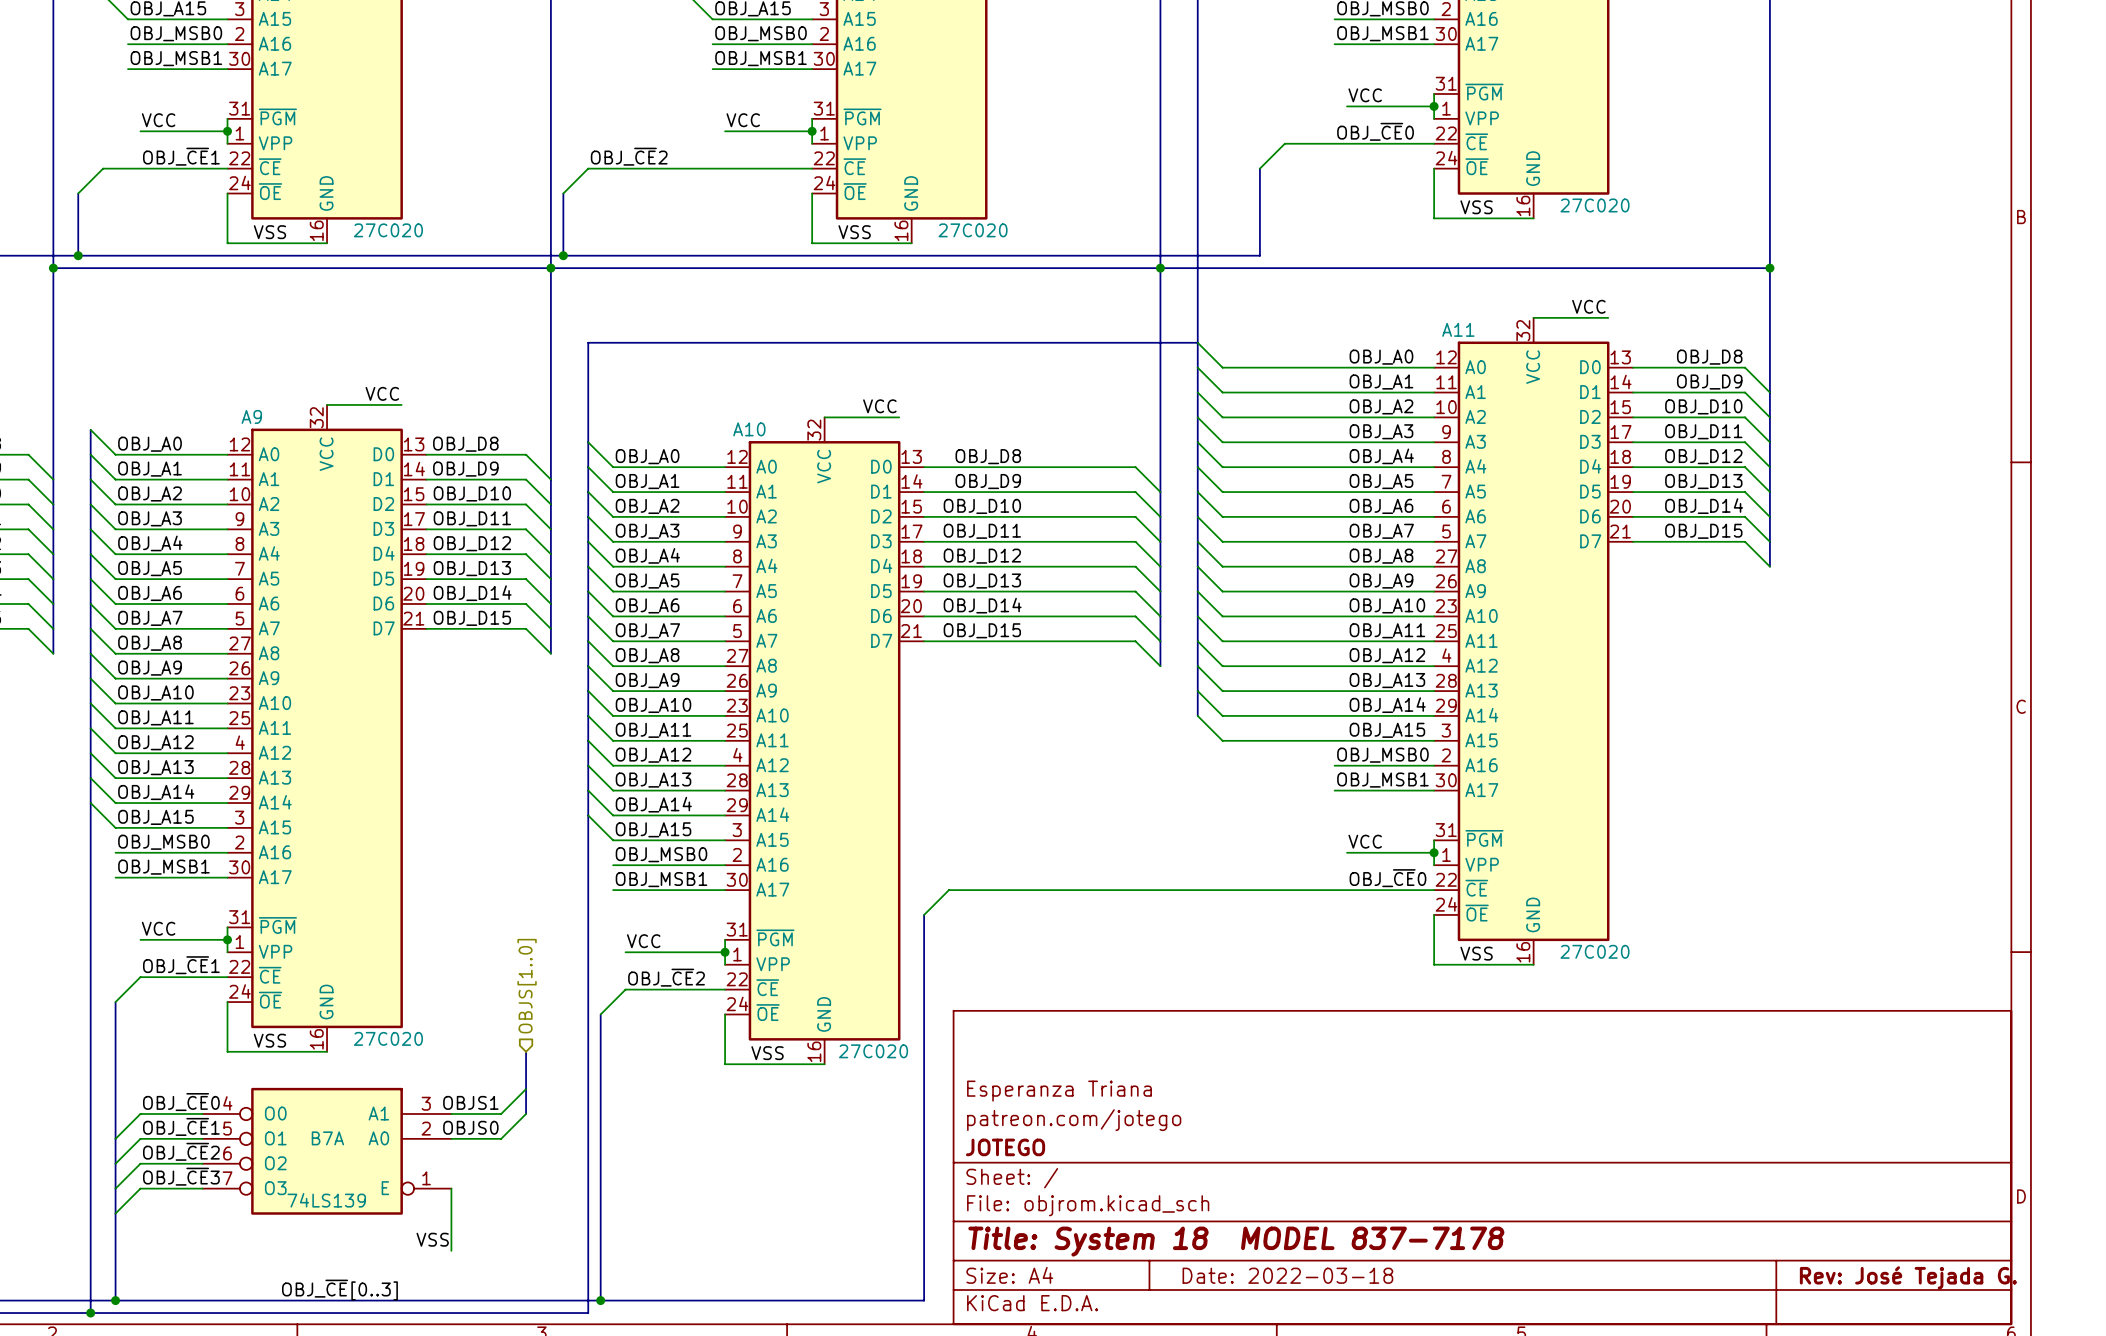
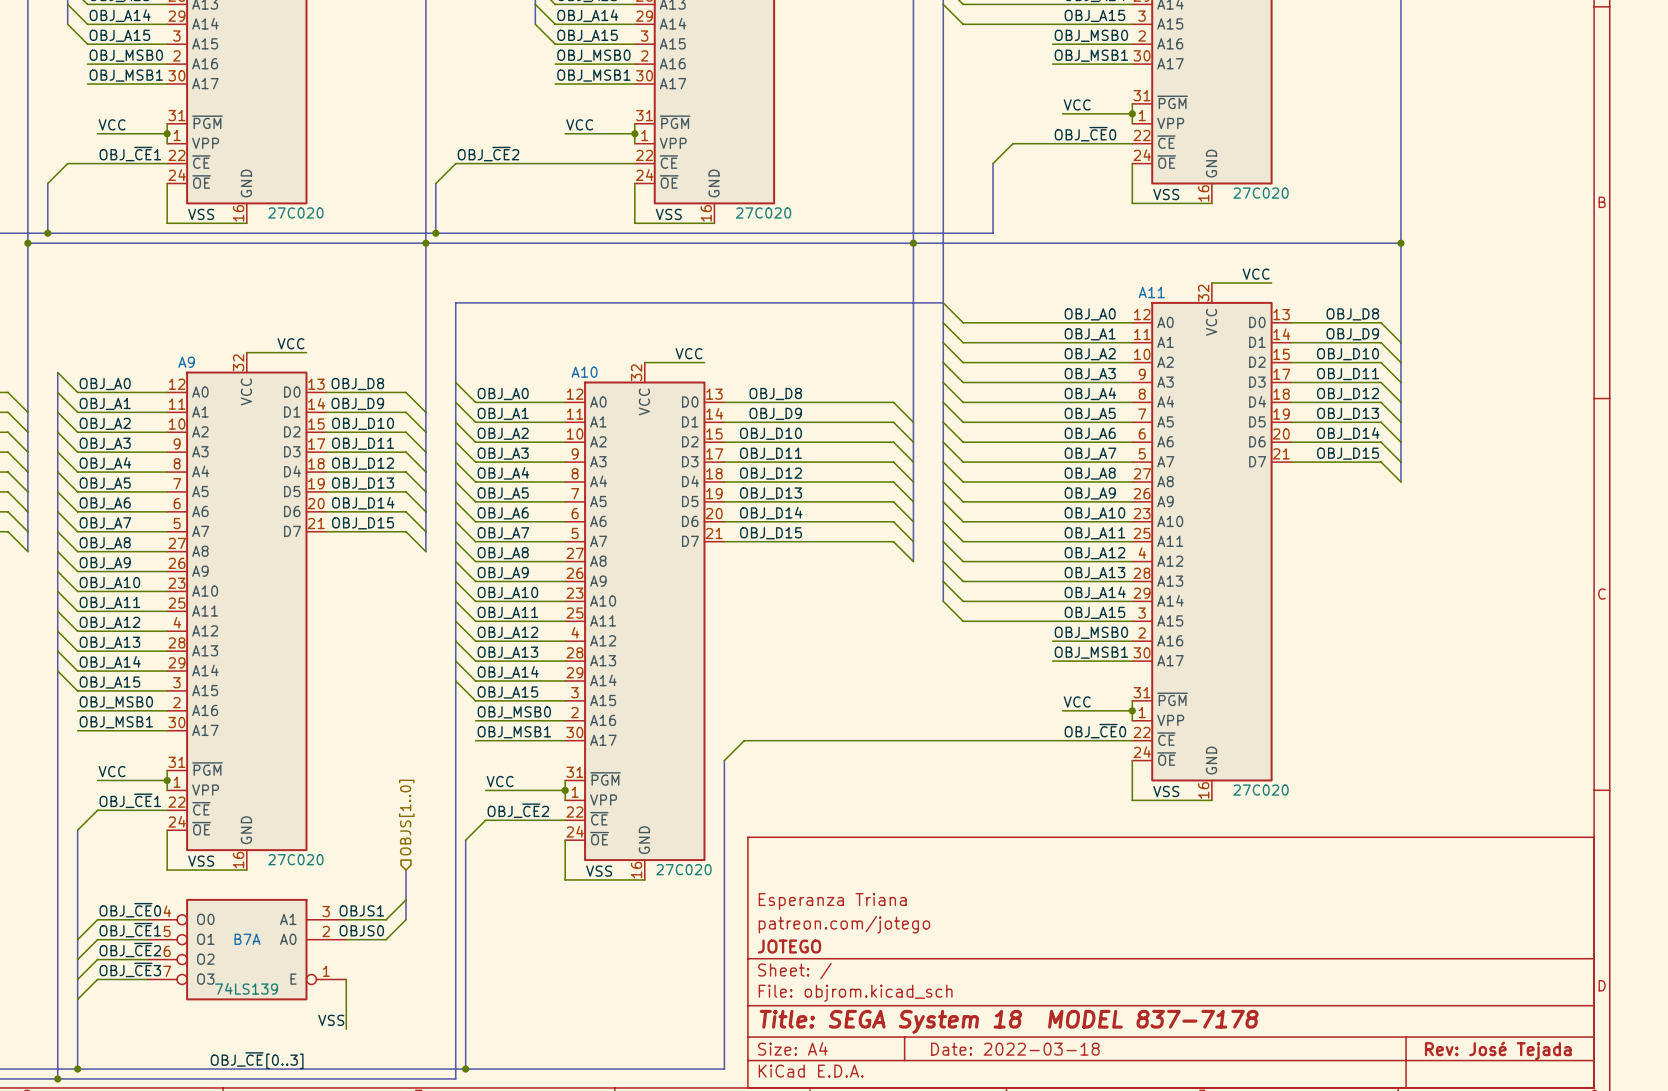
title block: Title: System 18 MODEL 837-7178 (1236, 1241) -> Title: SEGA System 18 MODEL 837-7178 (1009, 1021)
title block: Rev: José Tejada G. (1908, 1277) -> Rev: José Tejada (1498, 1050)

